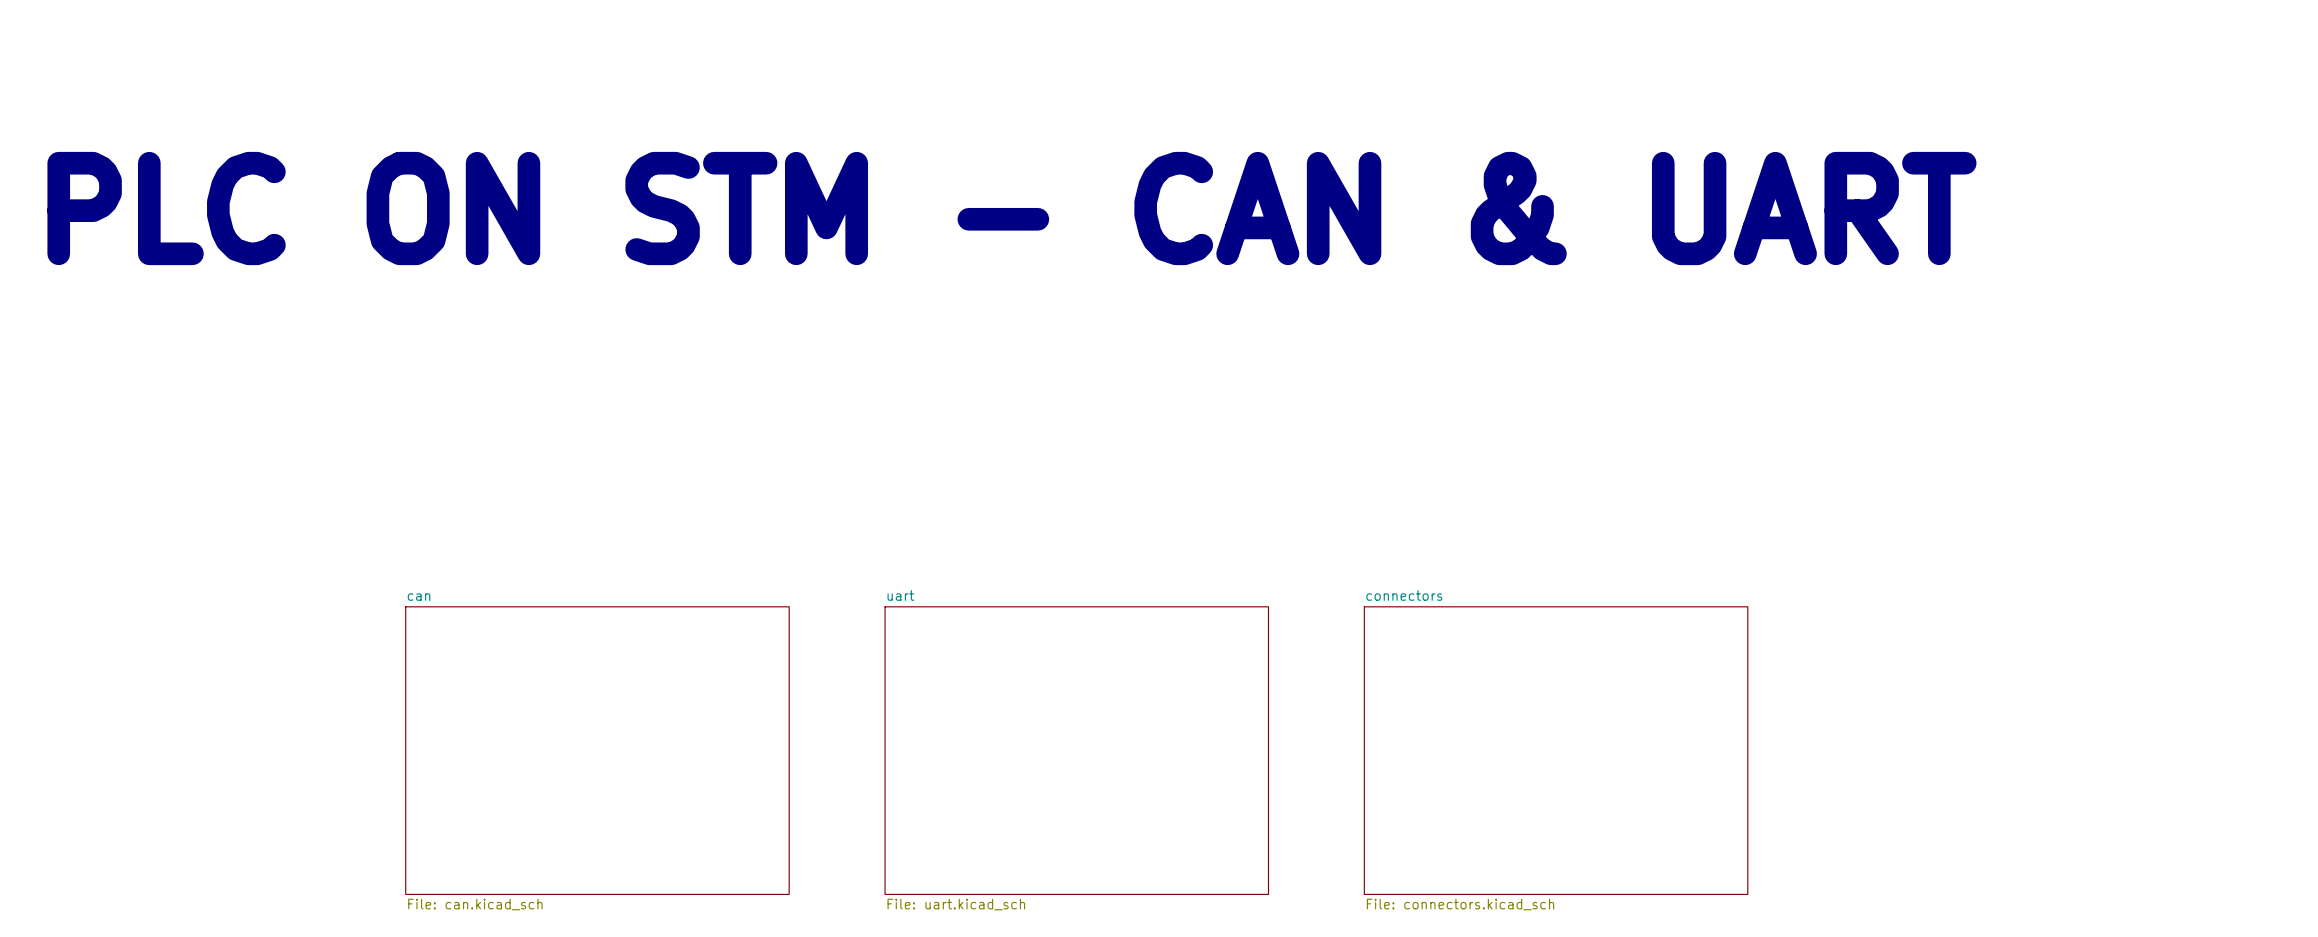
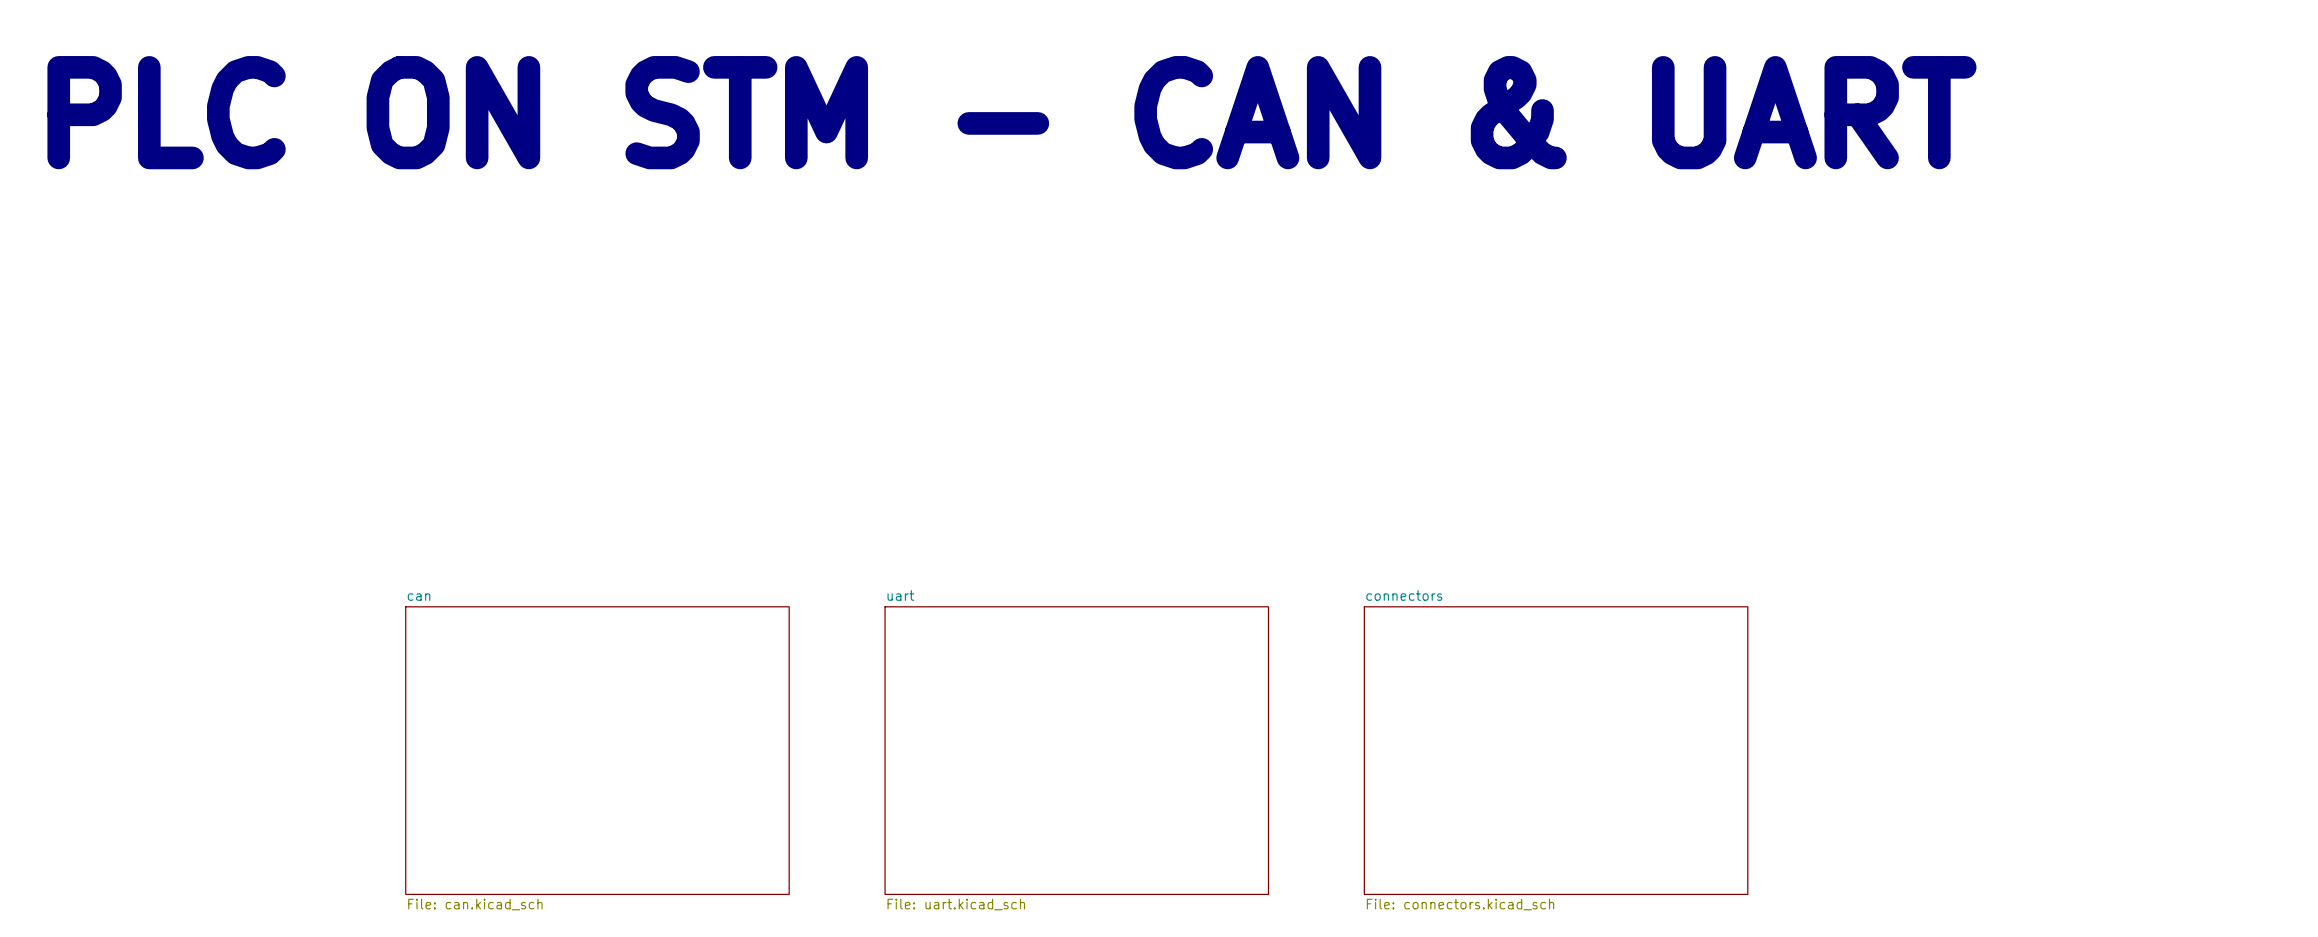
text position: PLC ON STM - CAN & UART (1011, 208) -> PLC ON STM - CAN & UART (1011, 112)

